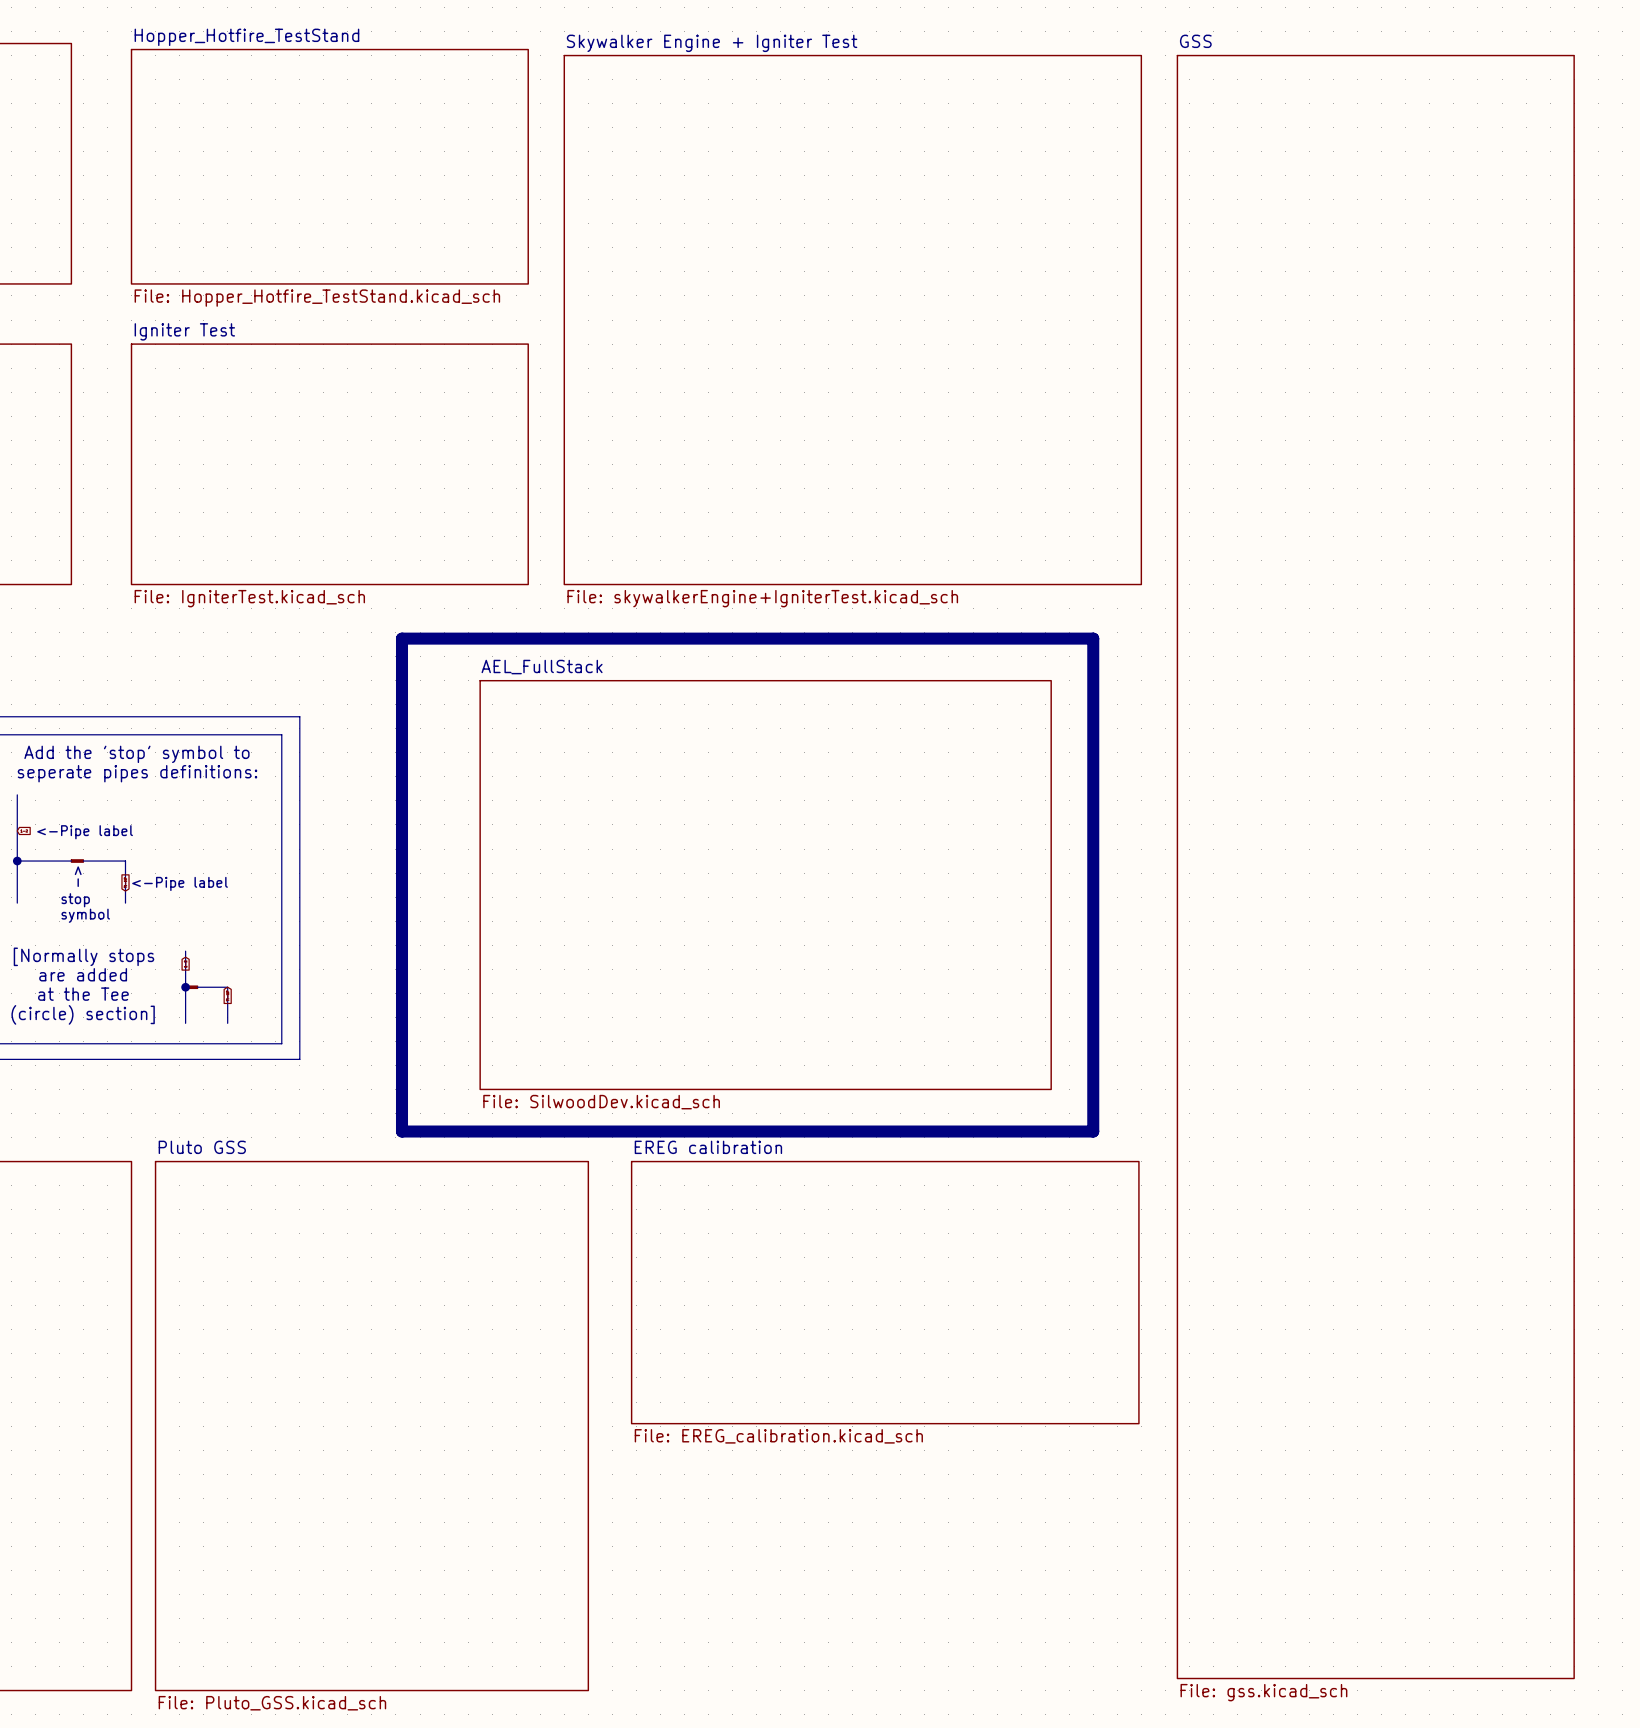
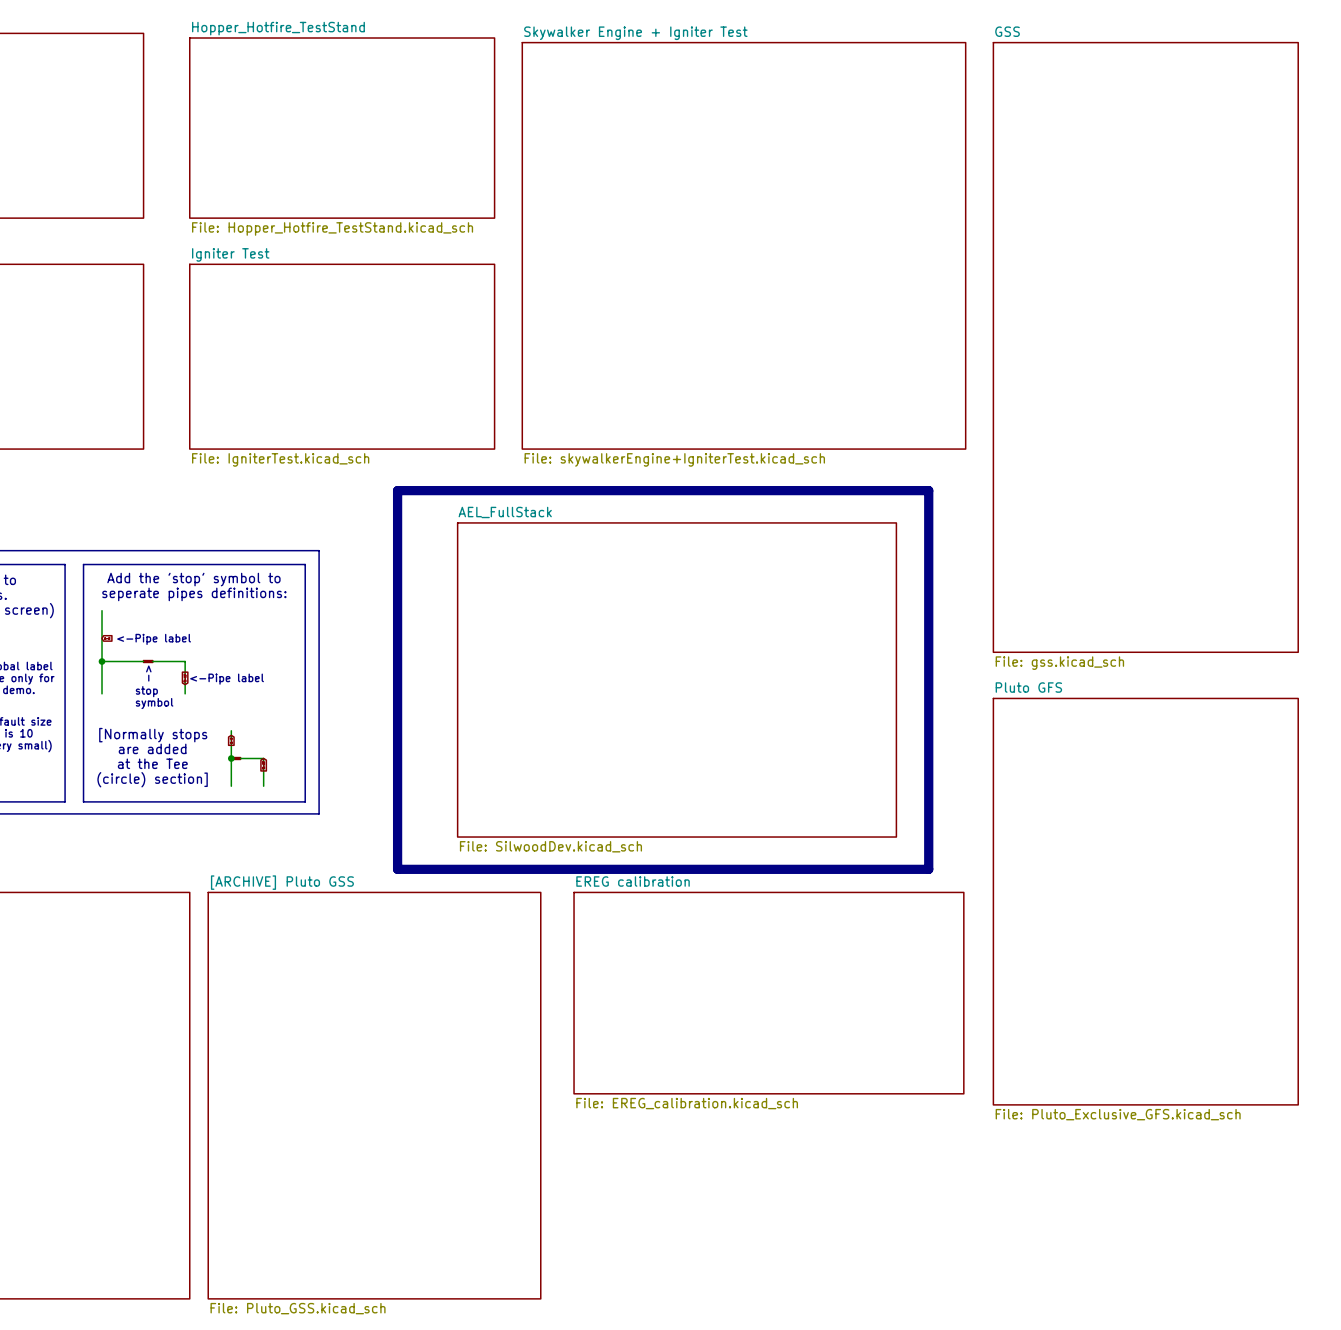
sheet GSS: none -> File: gss.kicad_sch (1145, 347)
sheet GSS: File: gss.kicad_sch (1375, 867) -> none
sheet Pluto GSS name: Pluto GSS (202, 1147) -> [ARCHIVE] Pluto GSS (282, 882)
sheet Pluto GFS: none -> File: Pluto_Exclusive_GFS.kicad_sch (1145, 901)

